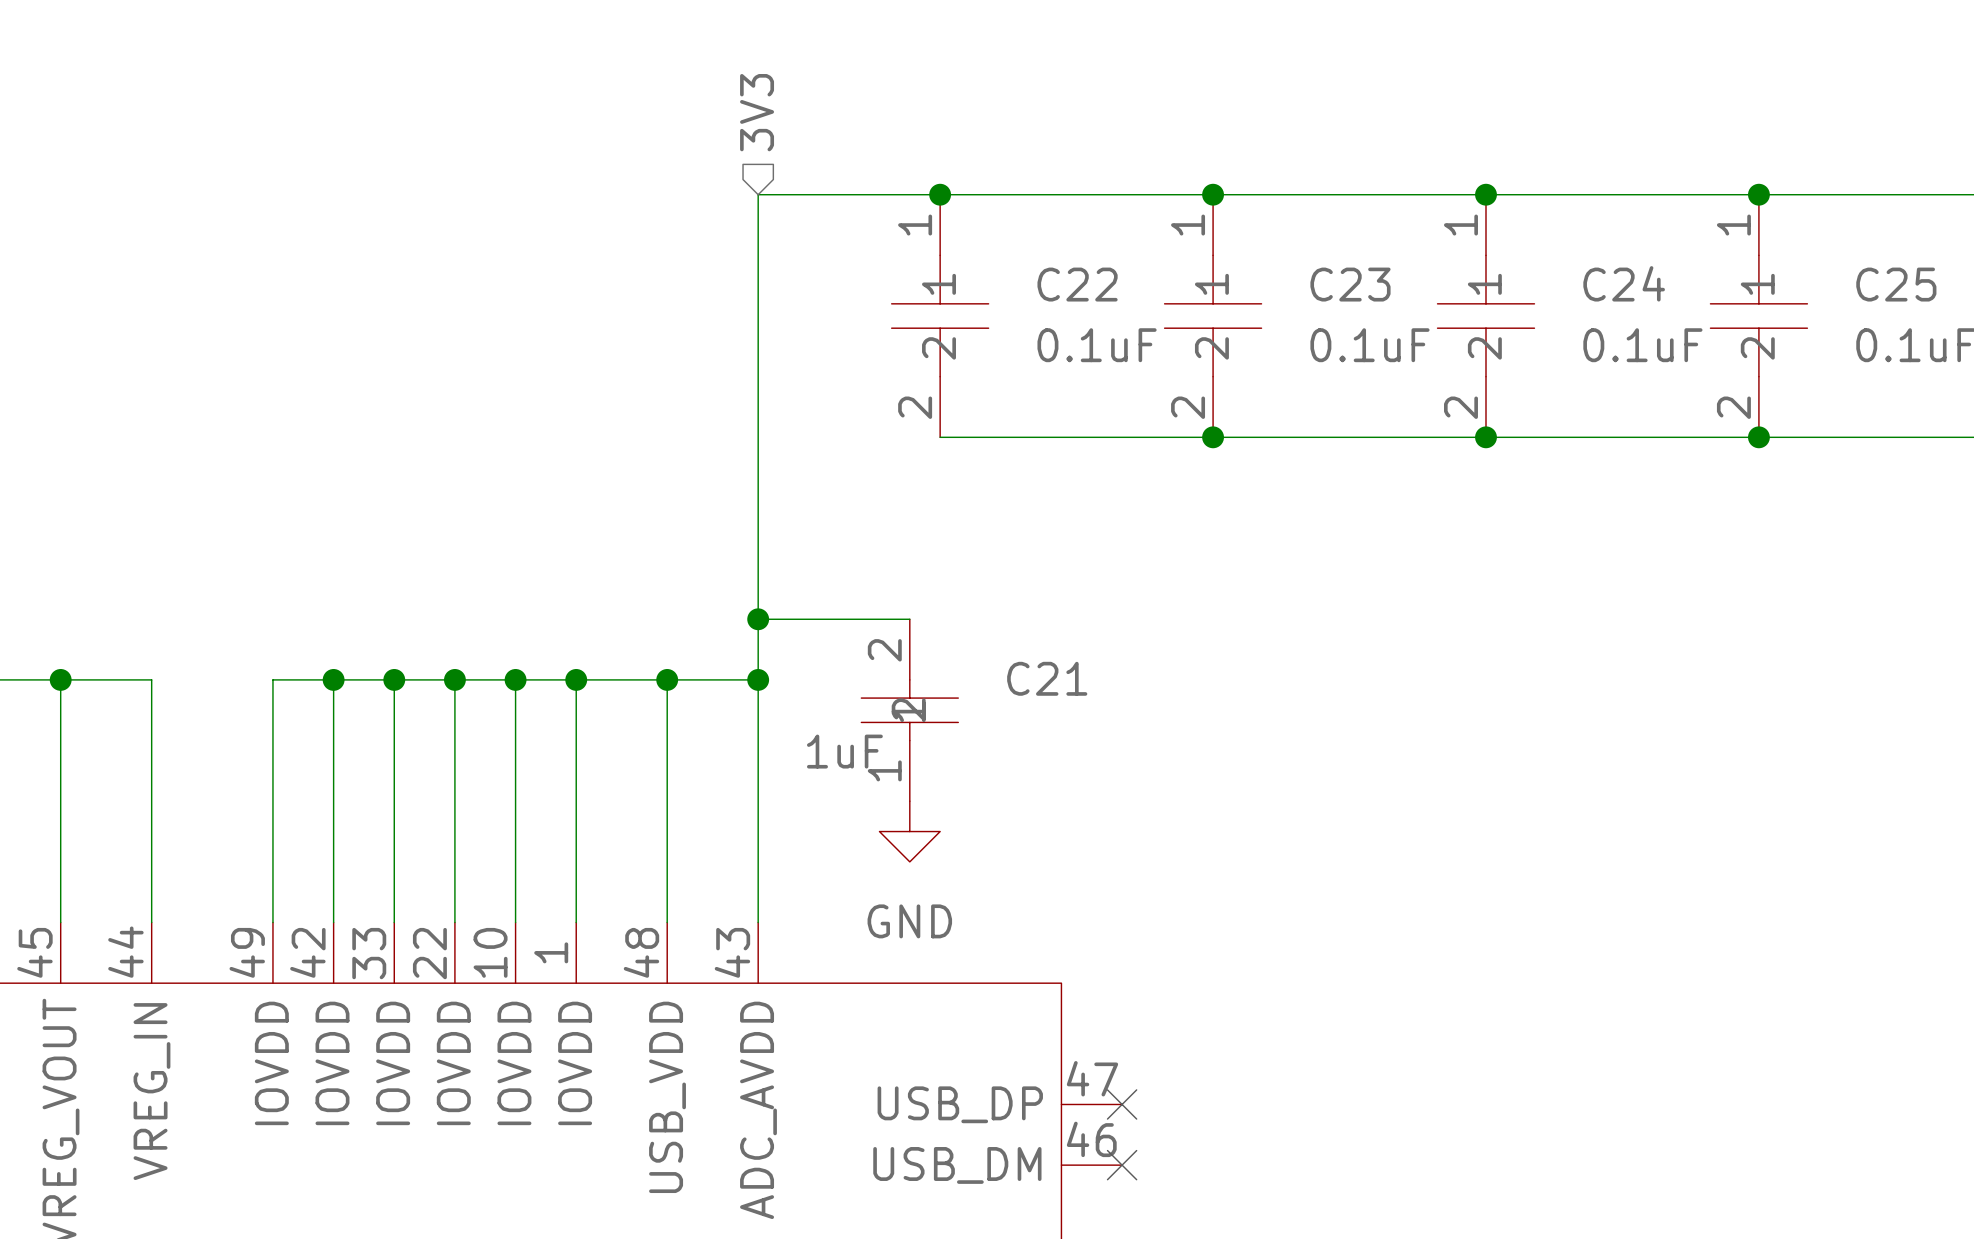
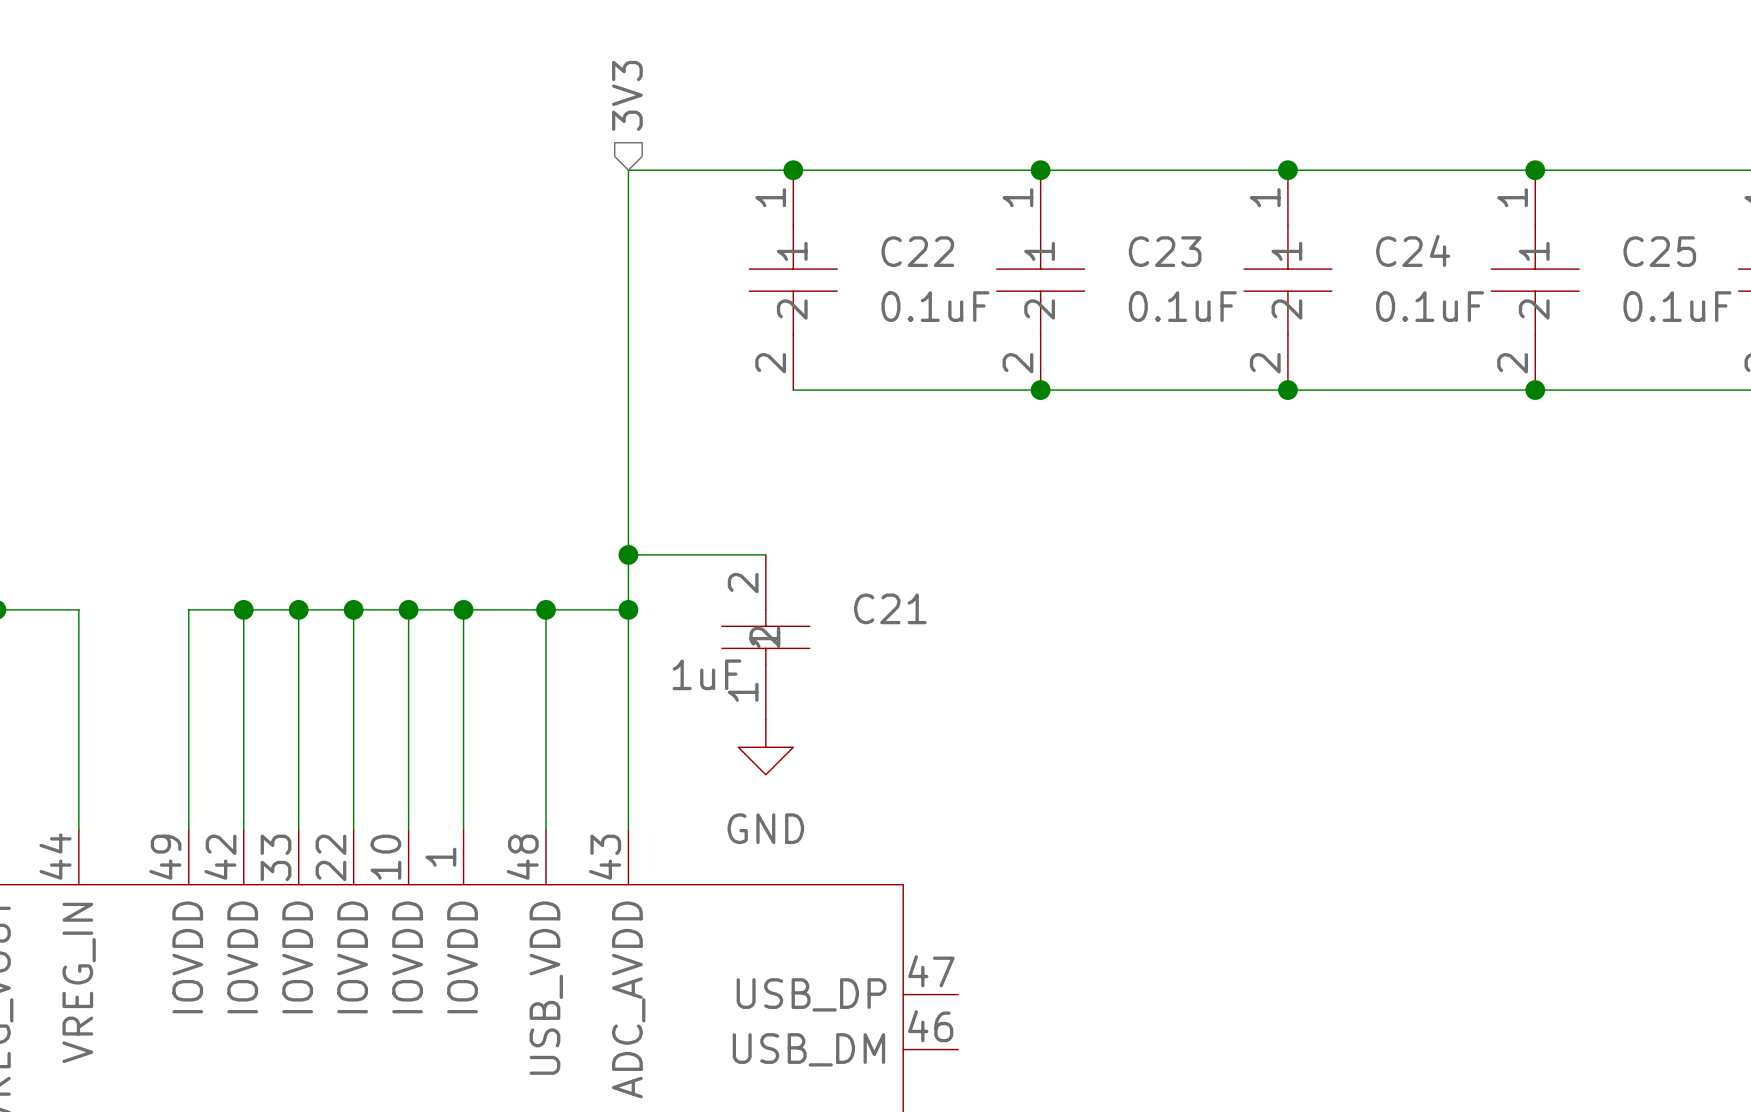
no-connect mark: (1122, 1104) -> none
no-connect mark: (1122, 1165) -> none

